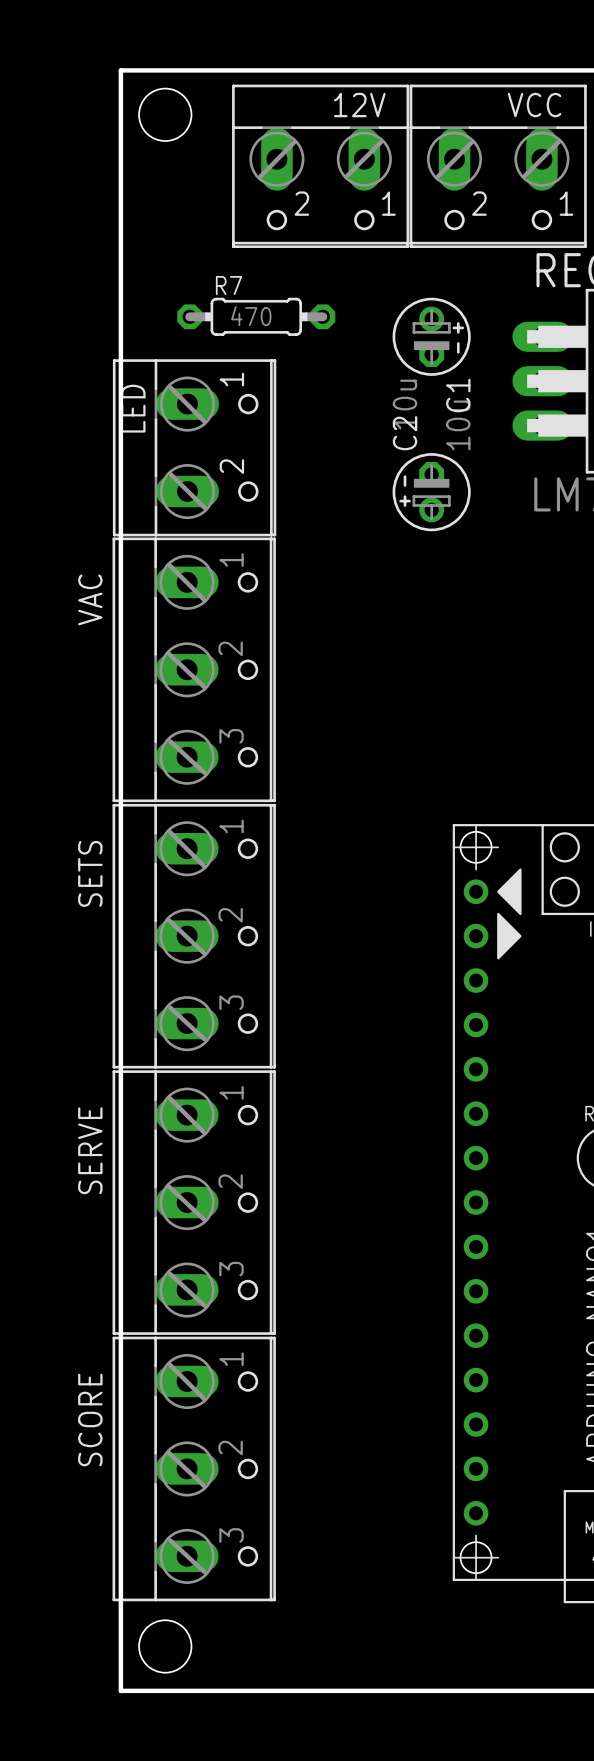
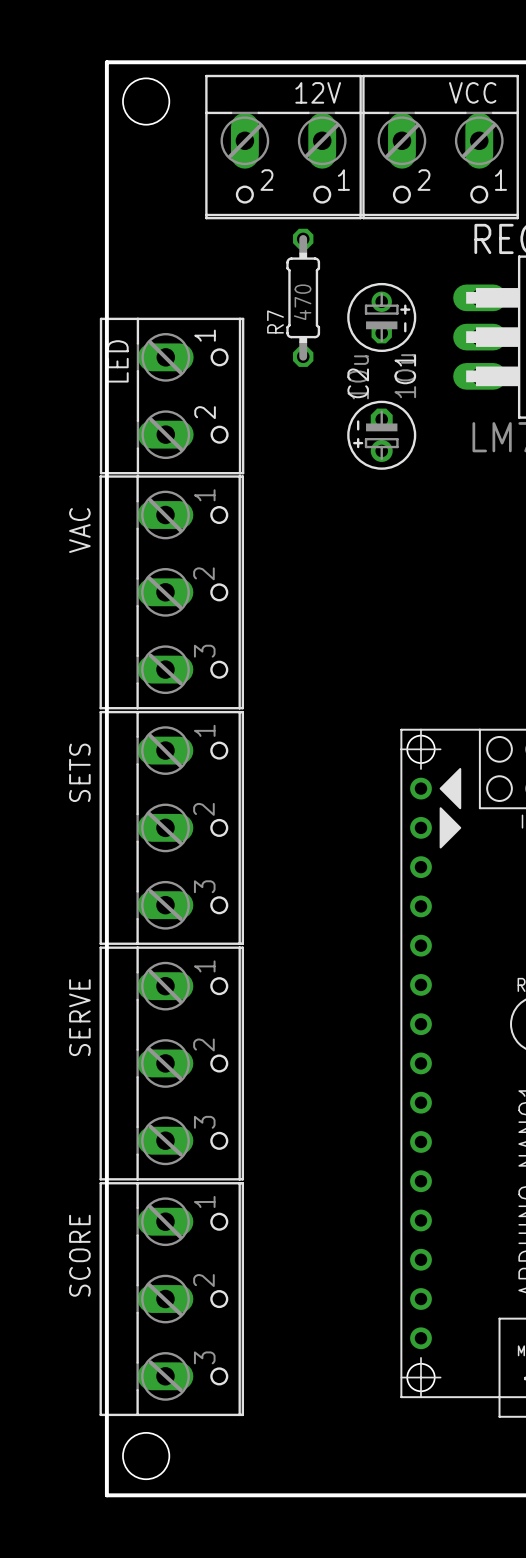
R7 name position: R7 (228, 285) -> R7 (275, 321)
R7 footprint: [177, 297, 336, 336] -> [286, 228, 321, 367]
C1 footprint: [392, 297, 471, 376] -> [347, 282, 417, 353]

